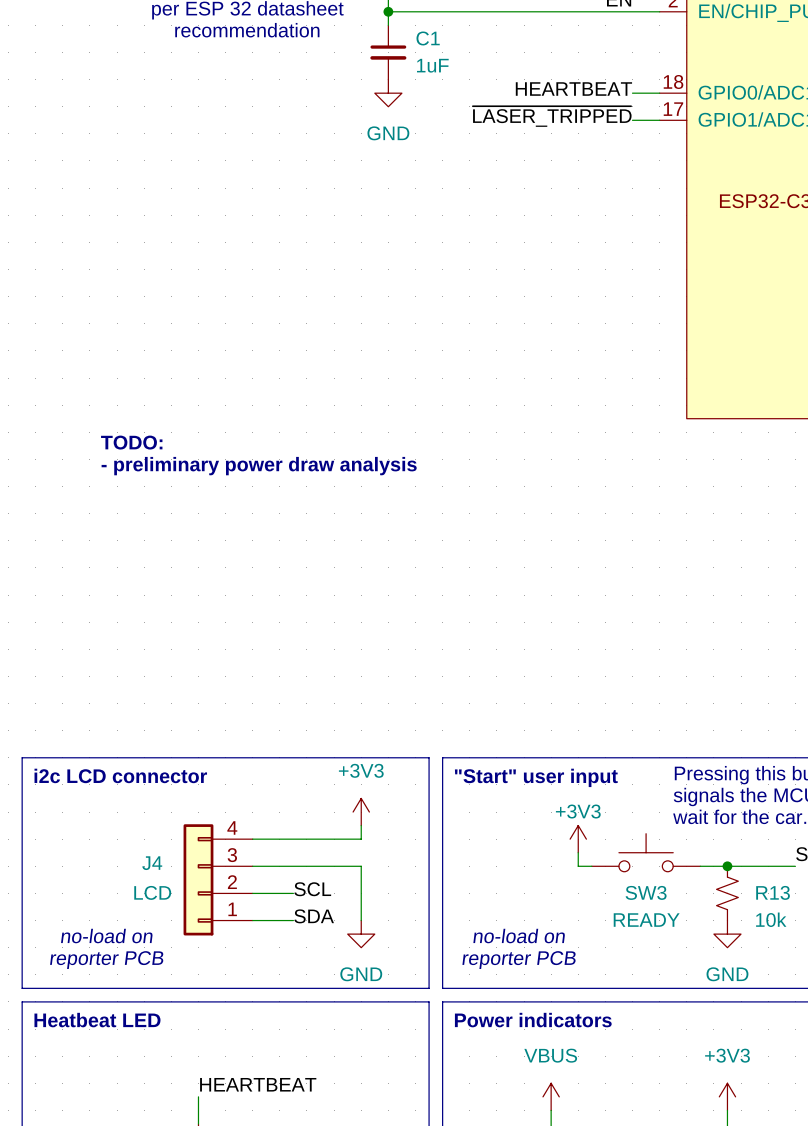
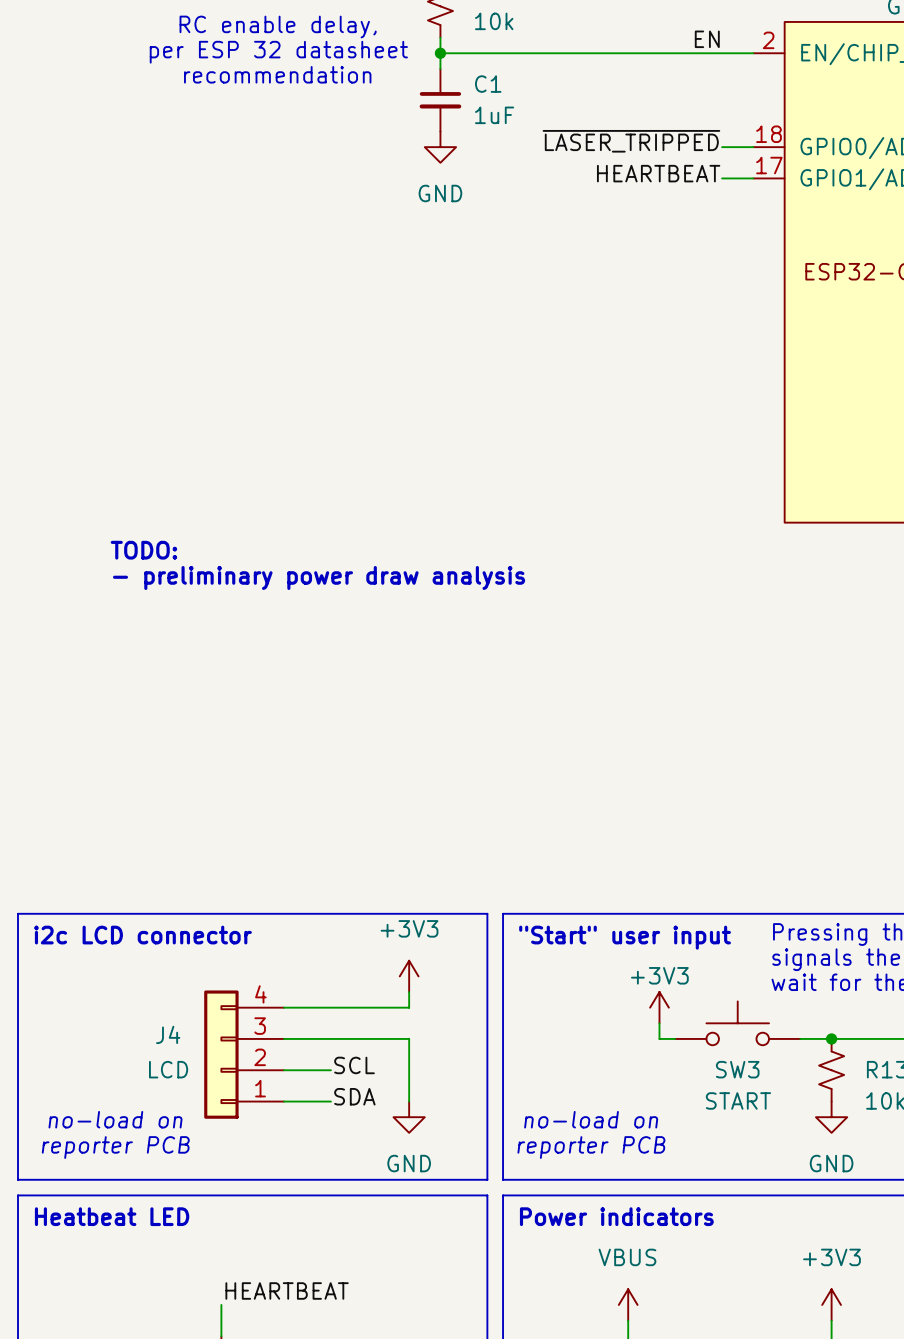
label: HEARTBEAT (573, 89) -> ~{LASER_TRIPPED} (631, 141)
label: ~{LASER_TRIPPED} (552, 116) -> HEARTBEAT (658, 173)
SW3 value: READY (646, 920) -> START (738, 1100)

